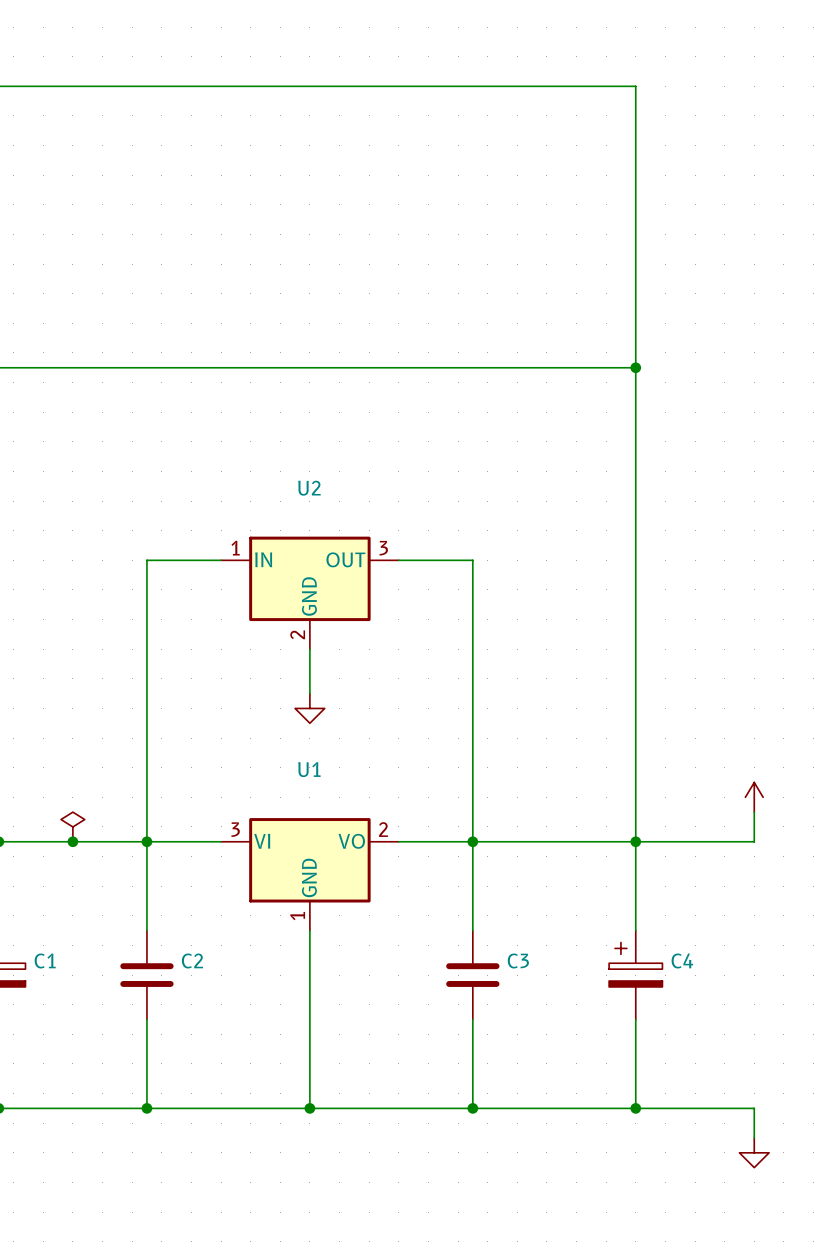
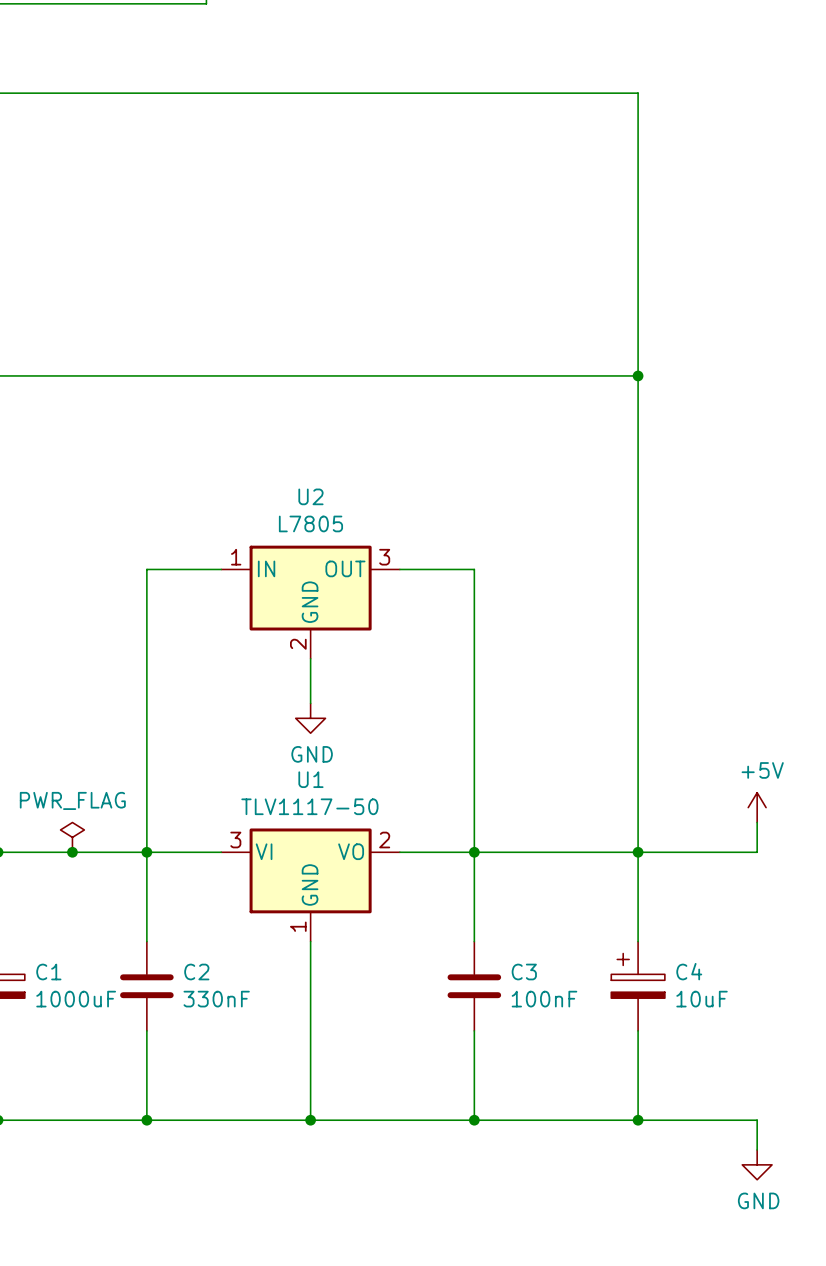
U2 value: none -> L7805 (310, 523)
power symbol text: none -> GND (312, 754)
power symbol text: none -> +5V (762, 770)
power symbol text: none -> PWR_FLAG (72, 800)
U1 value: none -> TLV1117-50 (309, 806)
C1 value: none -> 1000uF (76, 999)
C2 value: none -> 330nF (216, 999)
C3 value: none -> 100nF (544, 999)
C4 value: none -> 10uF (702, 999)
power symbol text: none -> GND (758, 1200)

